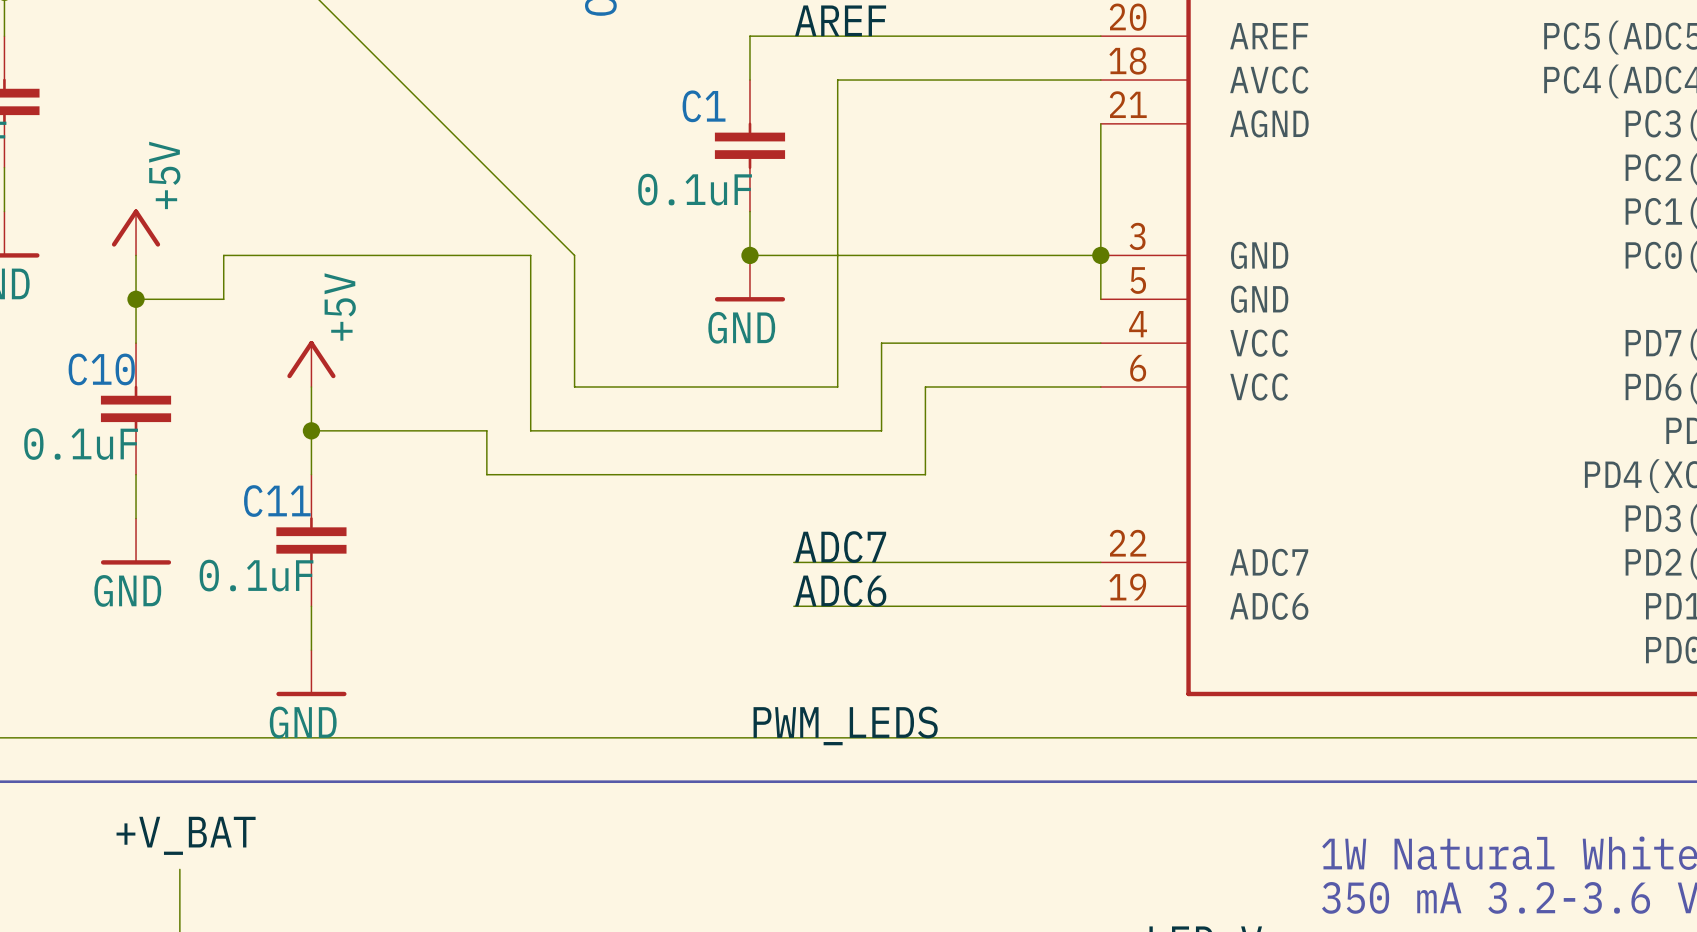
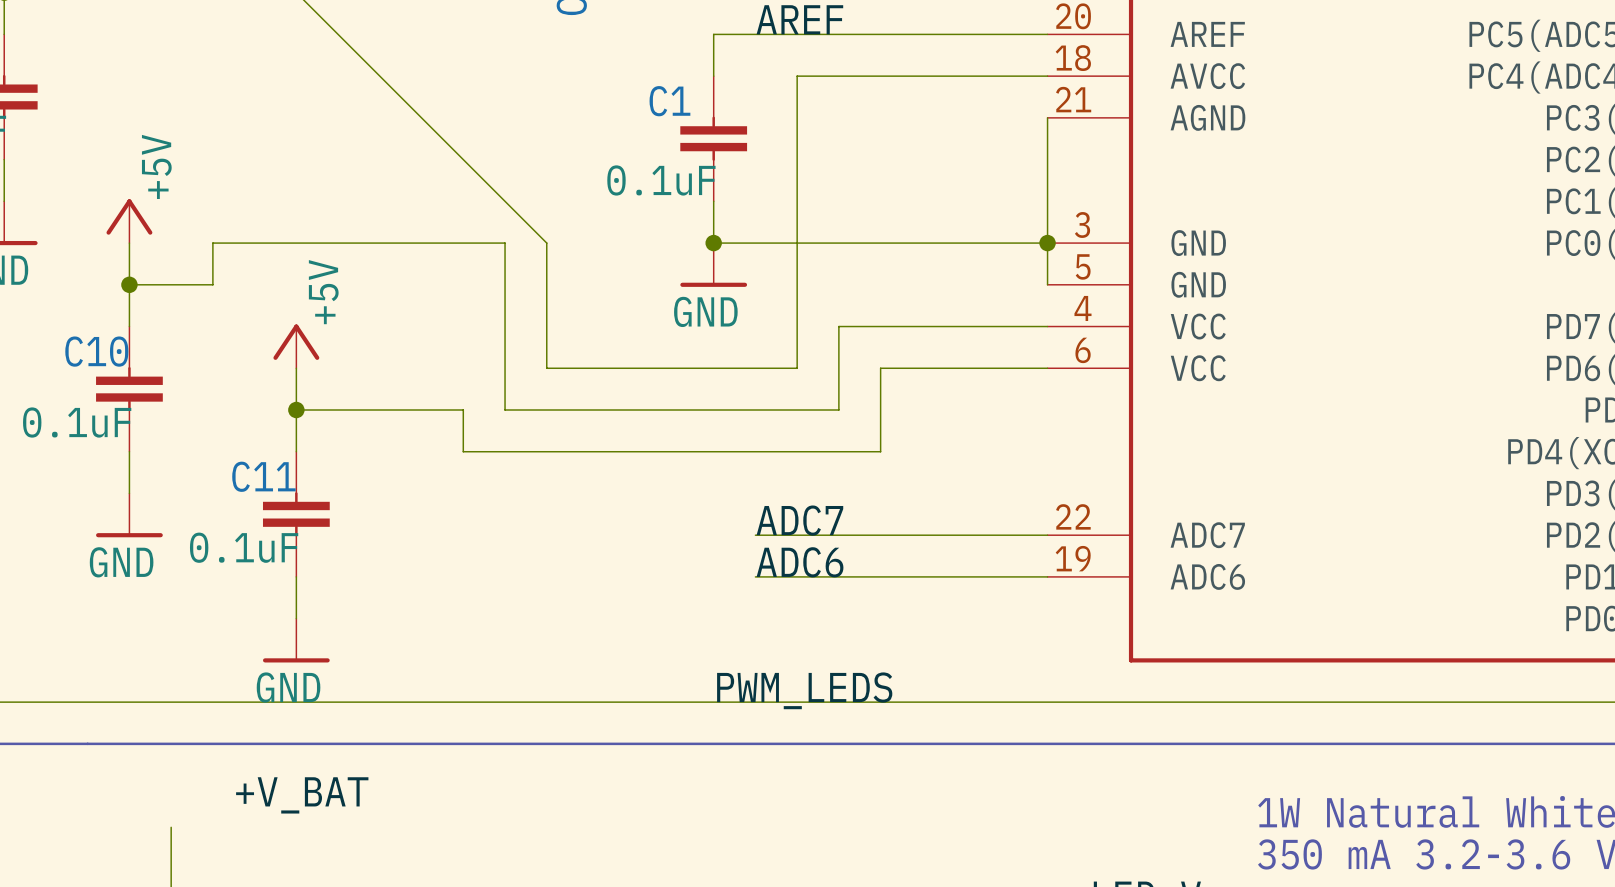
label position: +V_BAT (186, 835) -> +V_BAT (302, 795)

